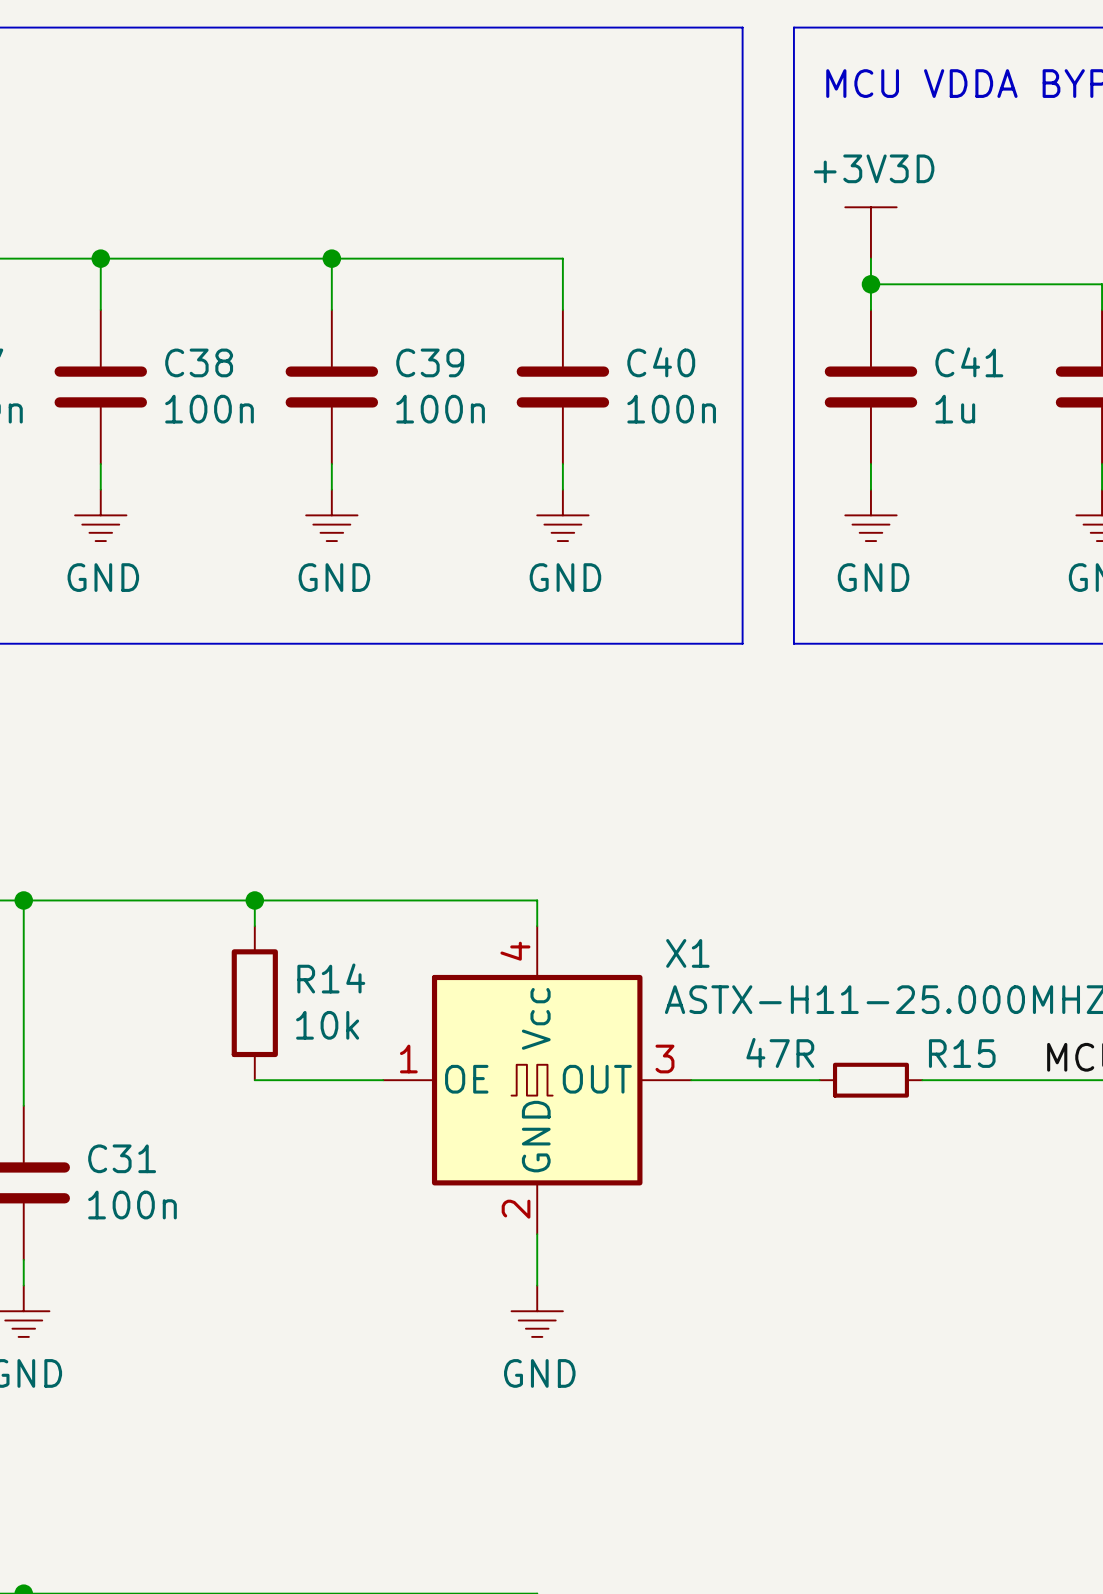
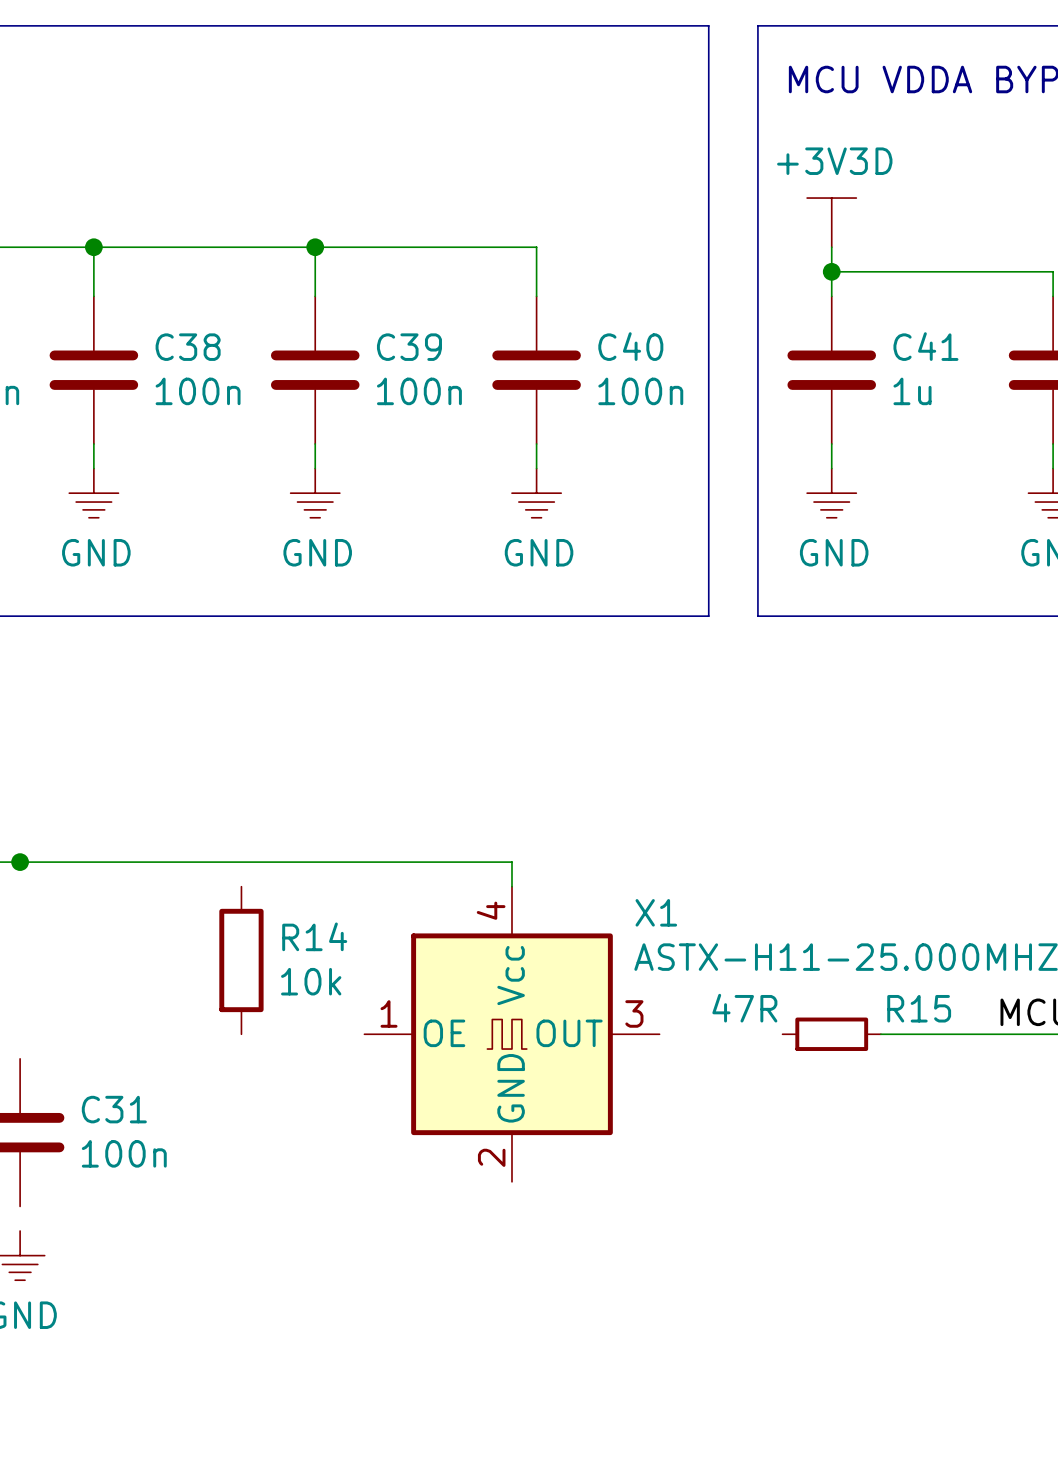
wire: (23, 900) (23, 1105) -> none
wire: (254, 900) (254, 926) -> none
junction: (254, 900) -> none
wire: (254, 1080) (383, 1080) -> none
wire: (691, 1080) (819, 1080) -> none
wire: (537, 1234) (537, 1285) -> none
wire: (23, 1259) (23, 1285) -> none
power symbol: GND (537, 1311) -> none

